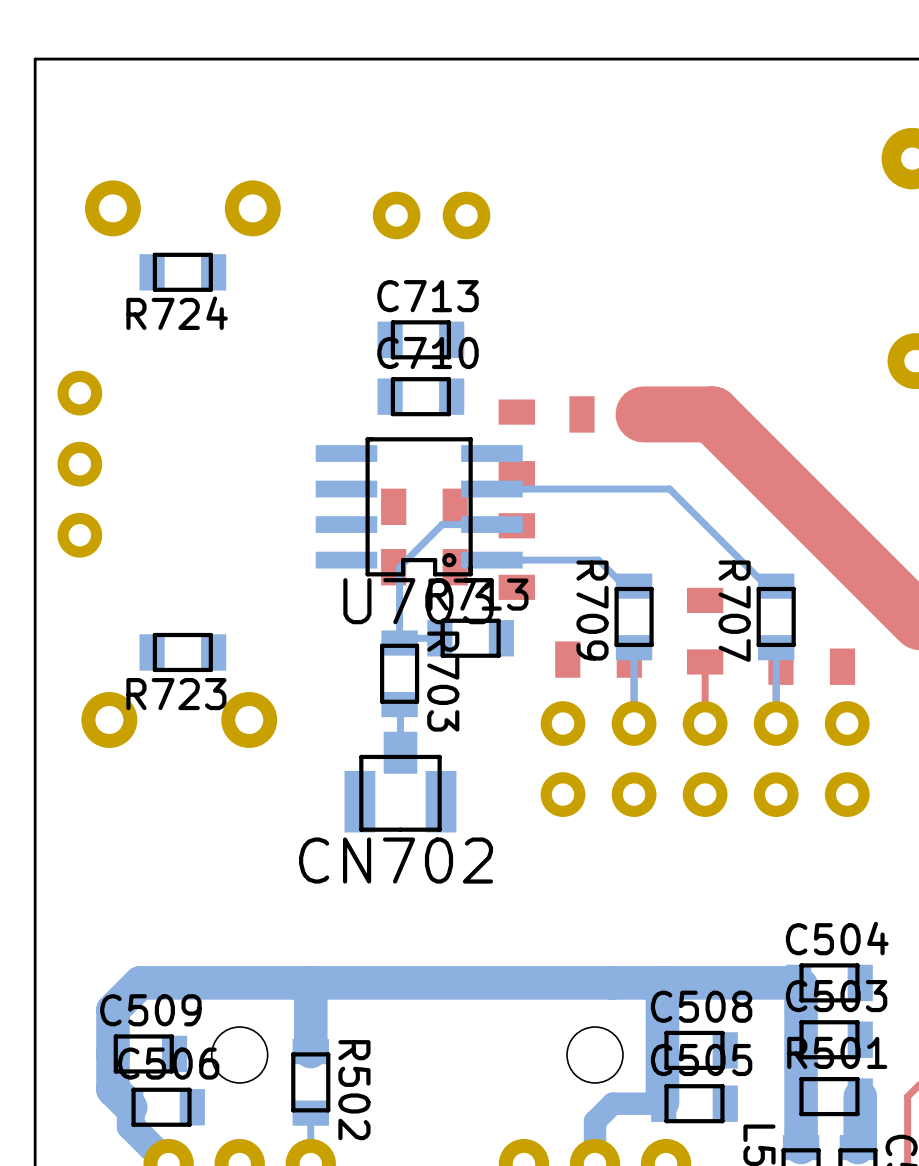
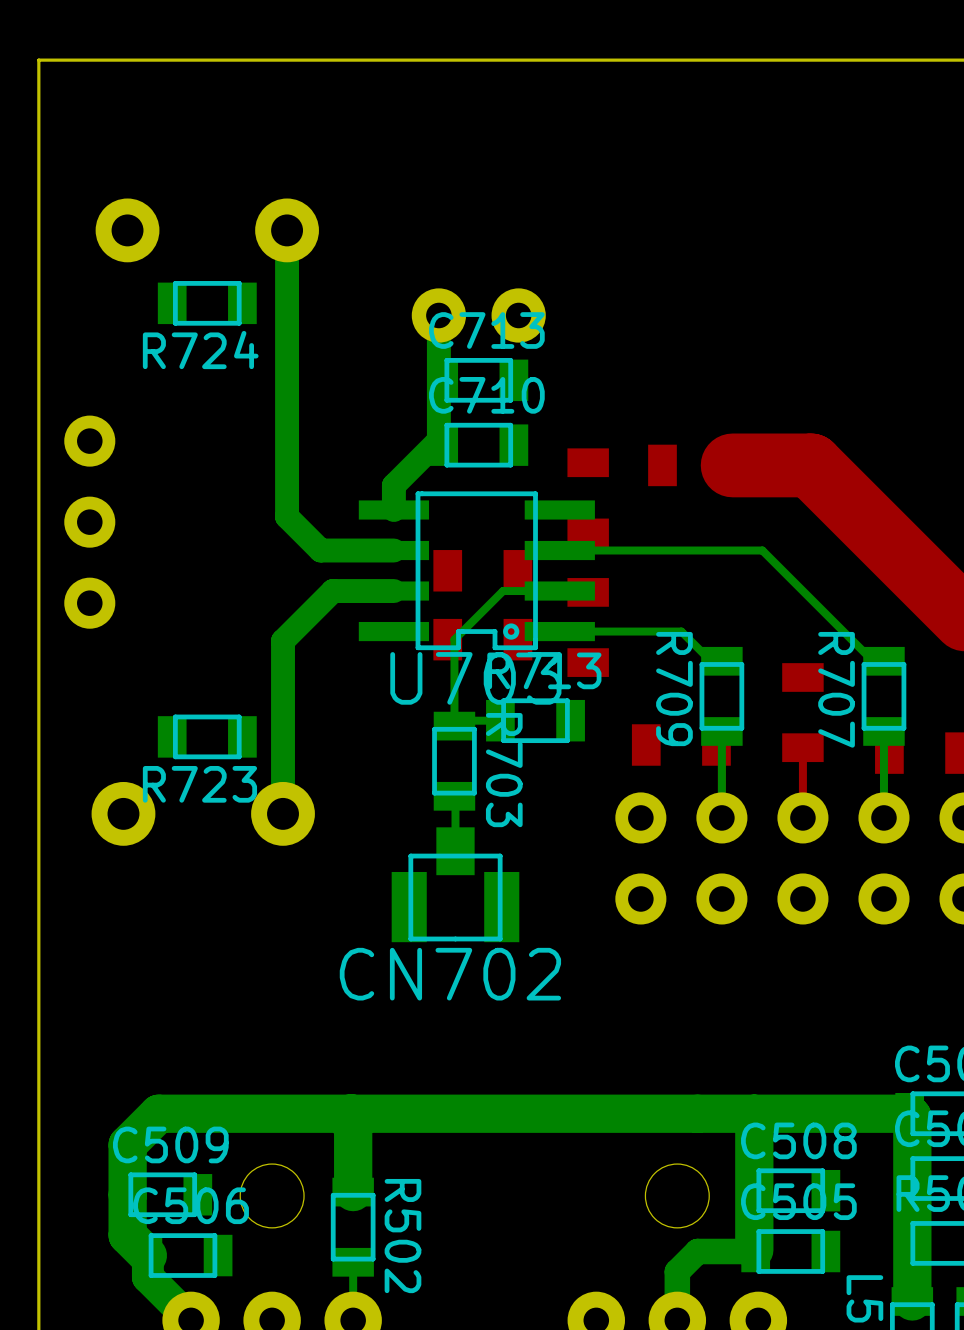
bottom track: none -> (287, 230) (287, 516) (320, 550) (393, 550)
part position: (431, 215) -> (478, 315)
bottom track: none -> (438, 315) (438, 440) (393, 485) (393, 509)
bottom track: none -> (393, 591) (332, 591) (283, 640) (283, 813)

